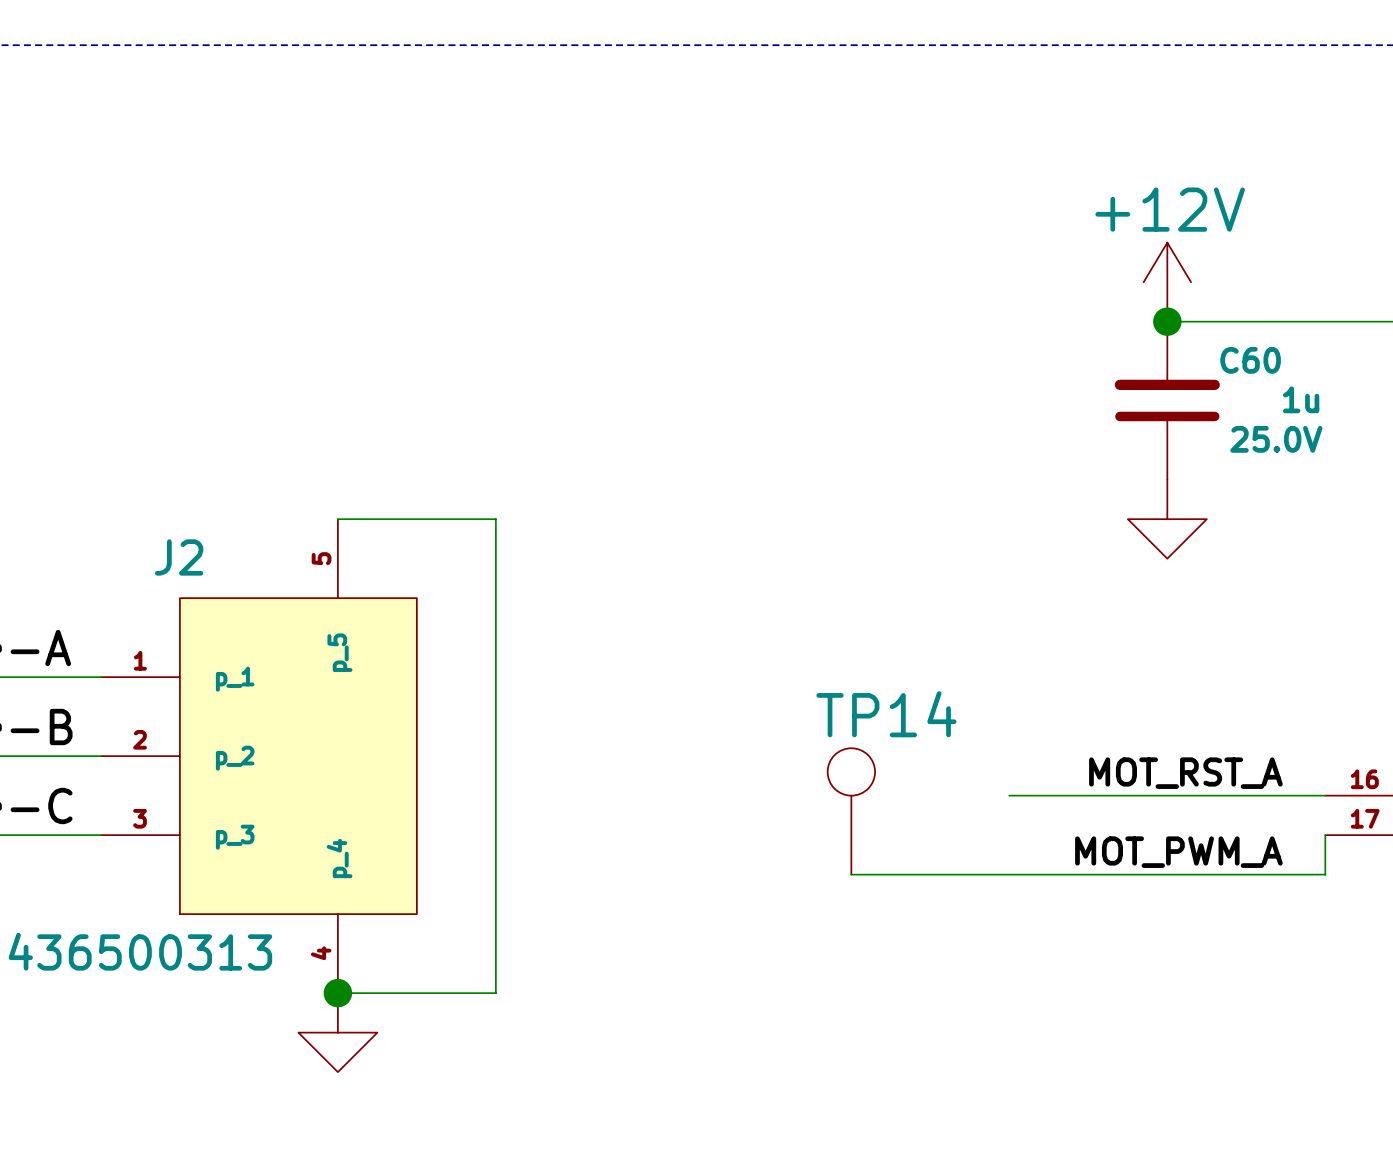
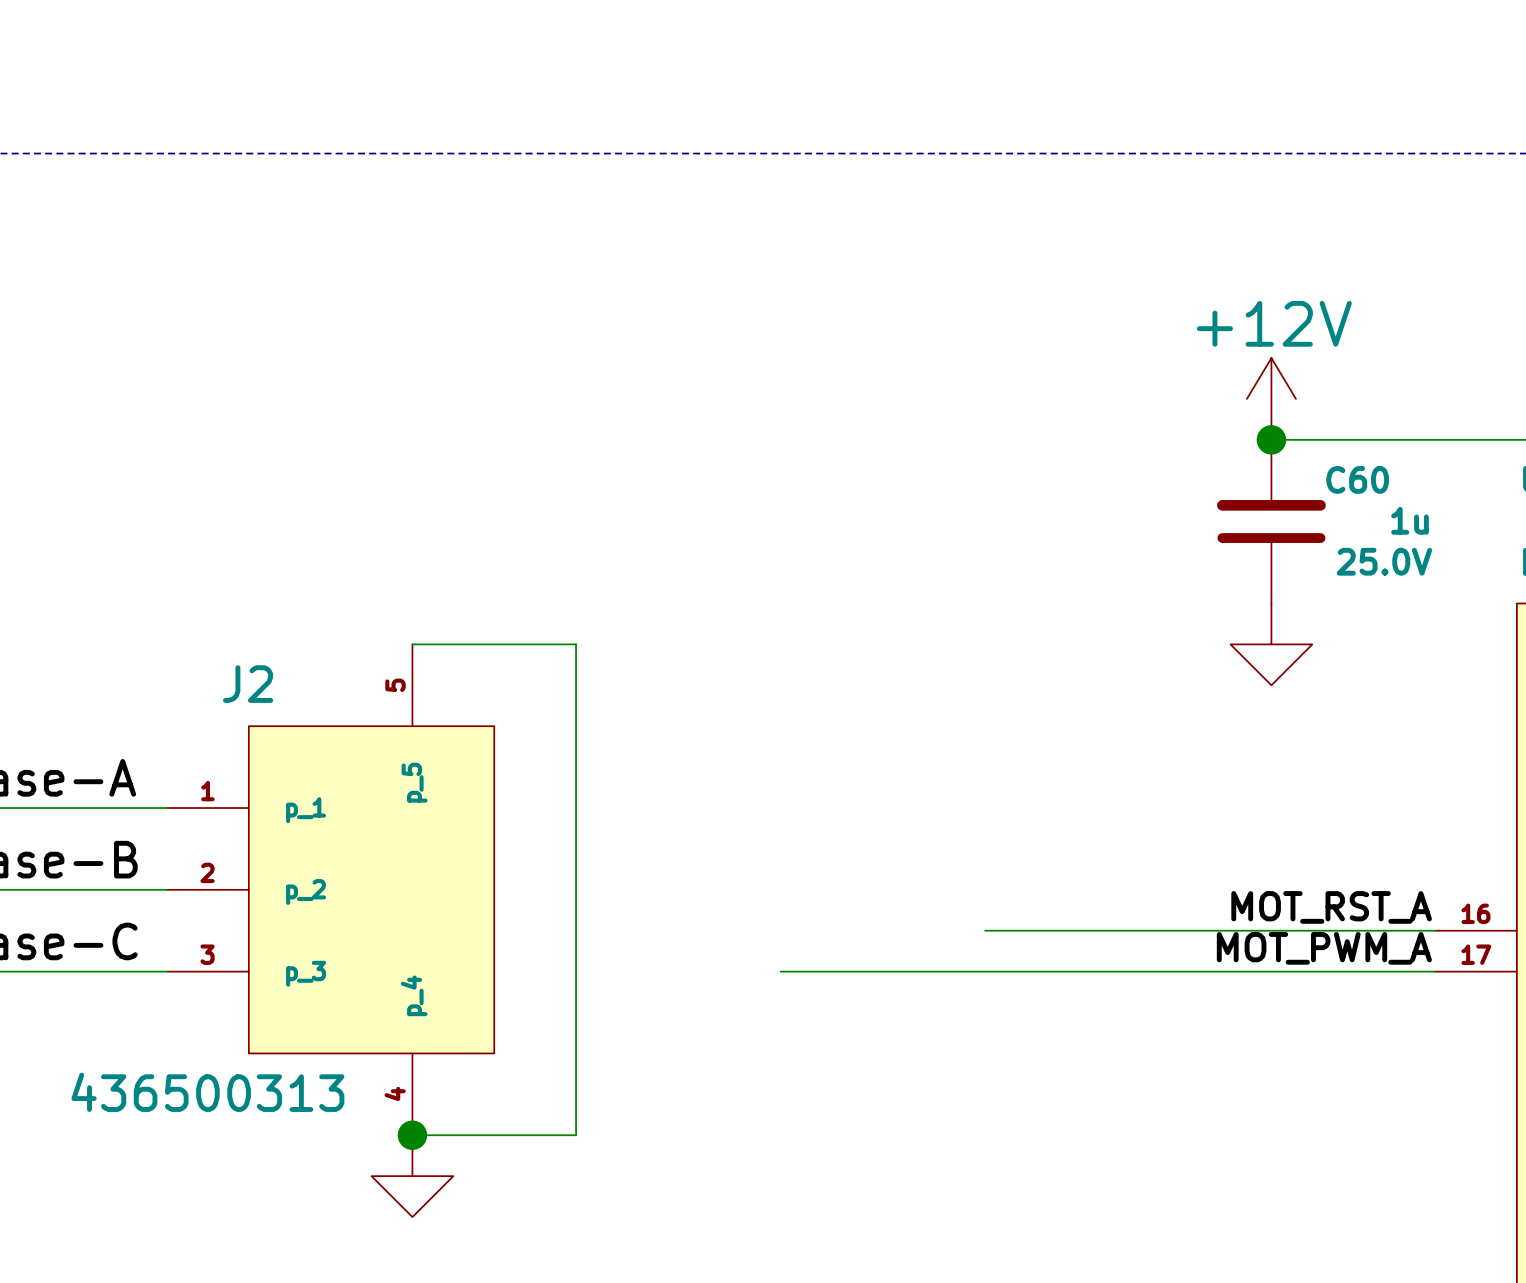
label position: MOT_RST_A (1185, 773) -> MOT_RST_A (1331, 907)
wire: none -> (985, 930) (1107, 930)
TP14: (851, 811) -> none
wire: (1325, 835) (1325, 874) (851, 874) -> (1435, 971) (780, 971)
label position: MOT_PWM_A (1178, 852) -> MOT_PWM_A (1324, 948)

